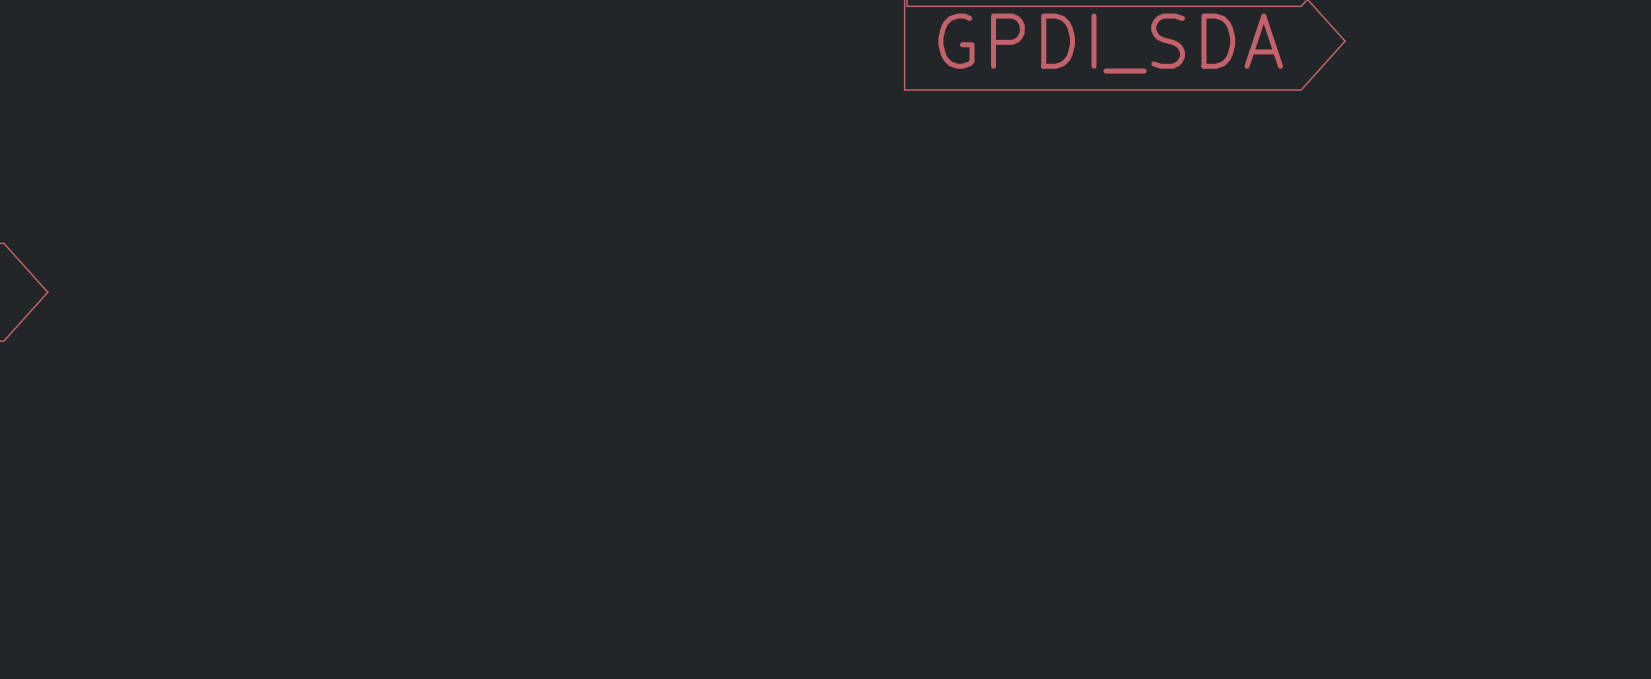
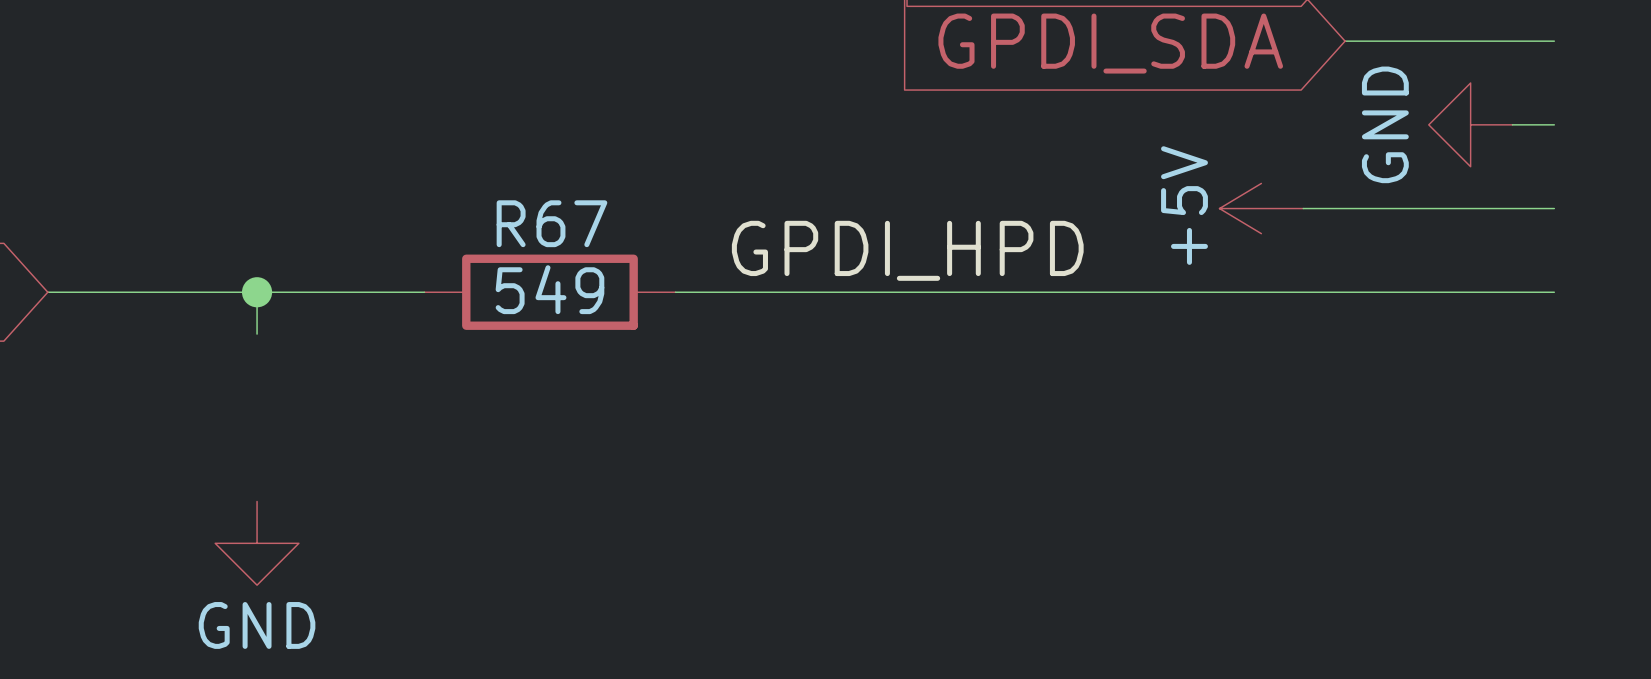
wire: none -> (1345, 41) (1554, 41)
power symbol: none -> GND (1470, 124)
wire: none -> (1512, 124) (1554, 124)
power symbol: none -> +5V (1261, 208)
wire: none -> (1303, 208) (1554, 208)
label: none -> GPDI_HPD (907, 250)
wire: none -> (47, 292) (424, 292)
wire: none -> (257, 292) (257, 334)
junction: none -> (257, 292)
R67: none -> 549 (549, 292)
wire: none -> (675, 292) (1554, 292)
power symbol: none -> GND (257, 543)

